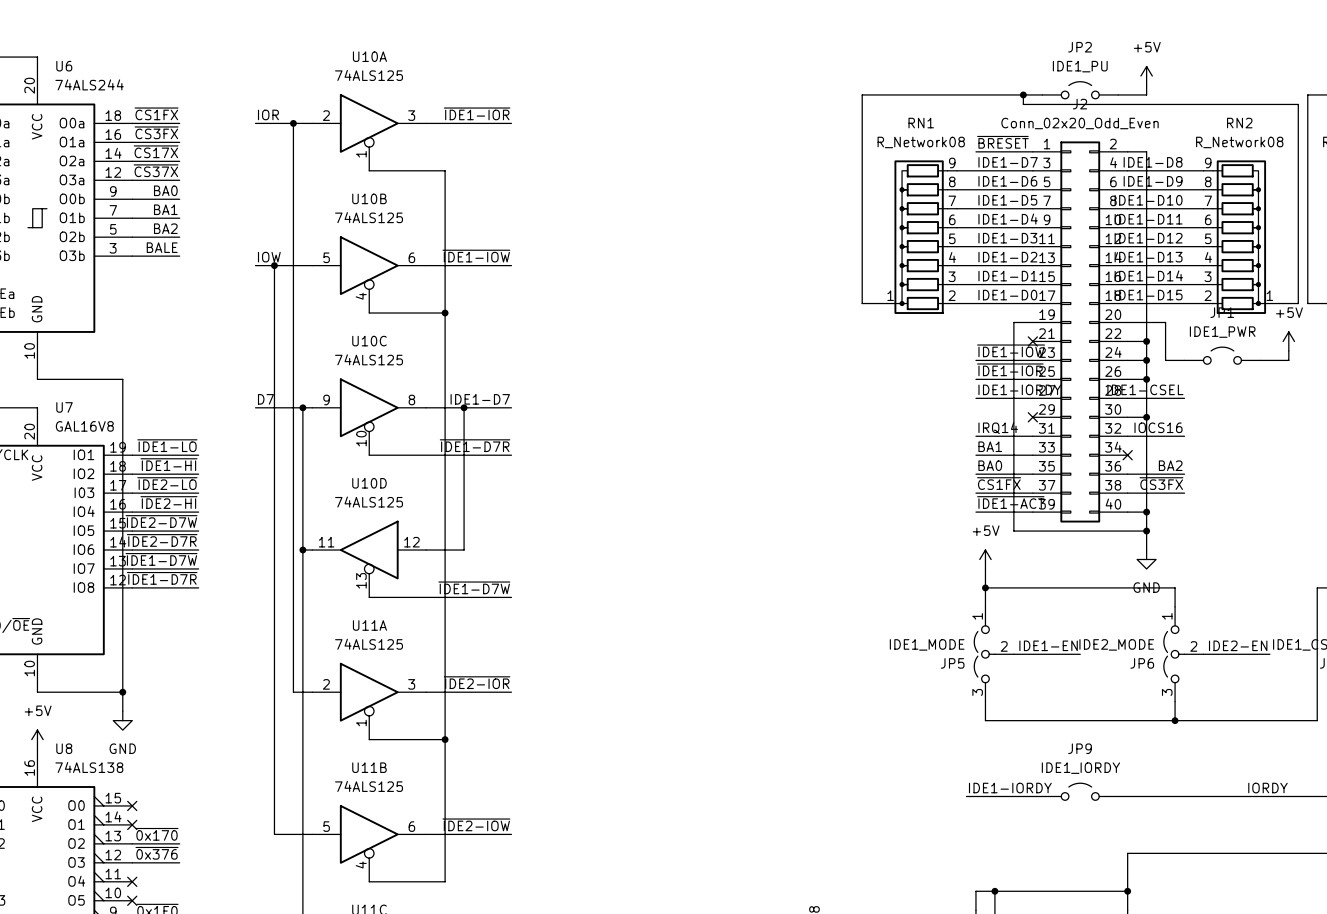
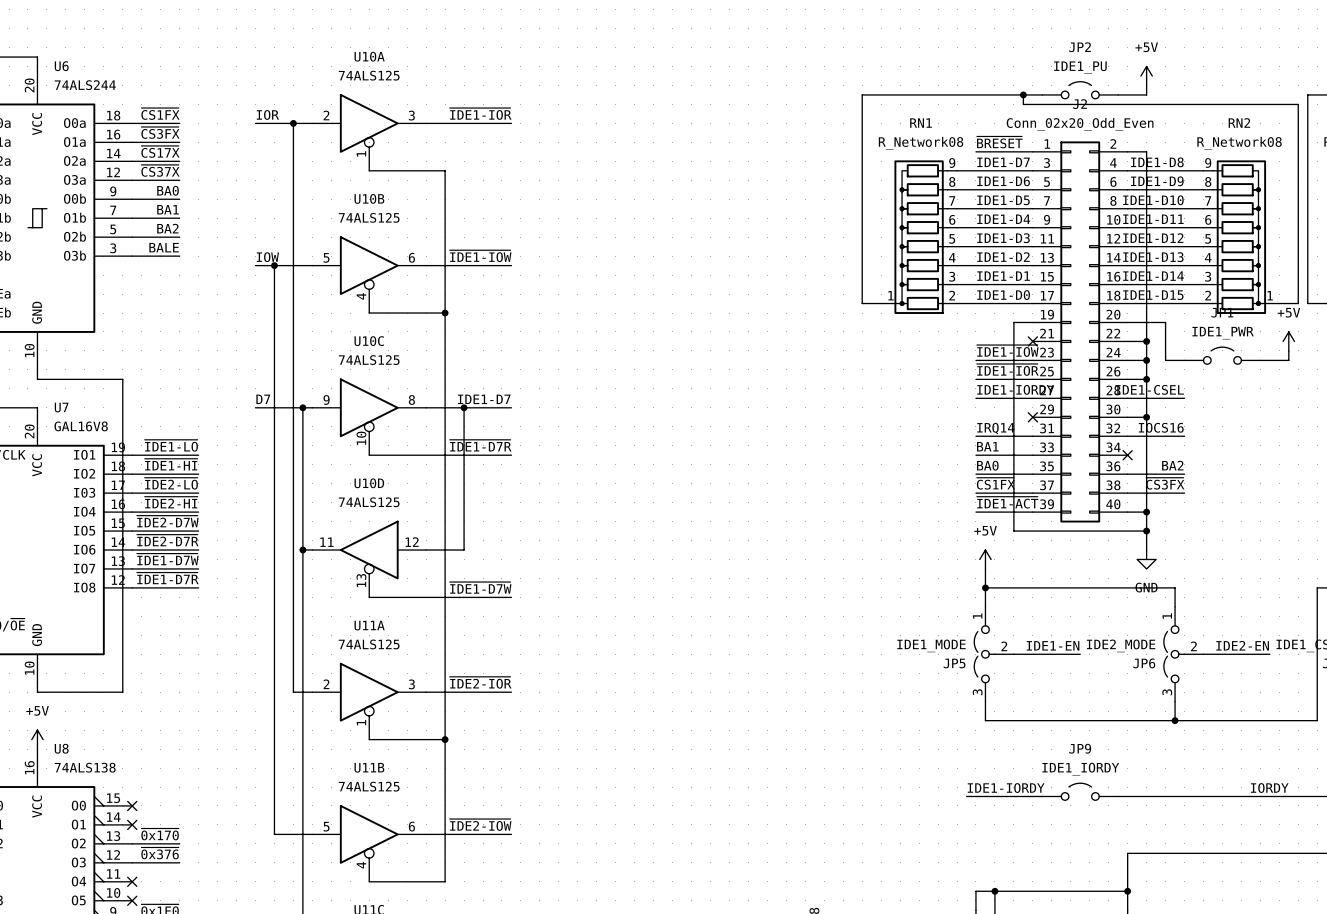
wire: (122, 692) (122, 711) -> none
junction: (122, 692) -> none
power symbol: GND (122, 720) -> none

